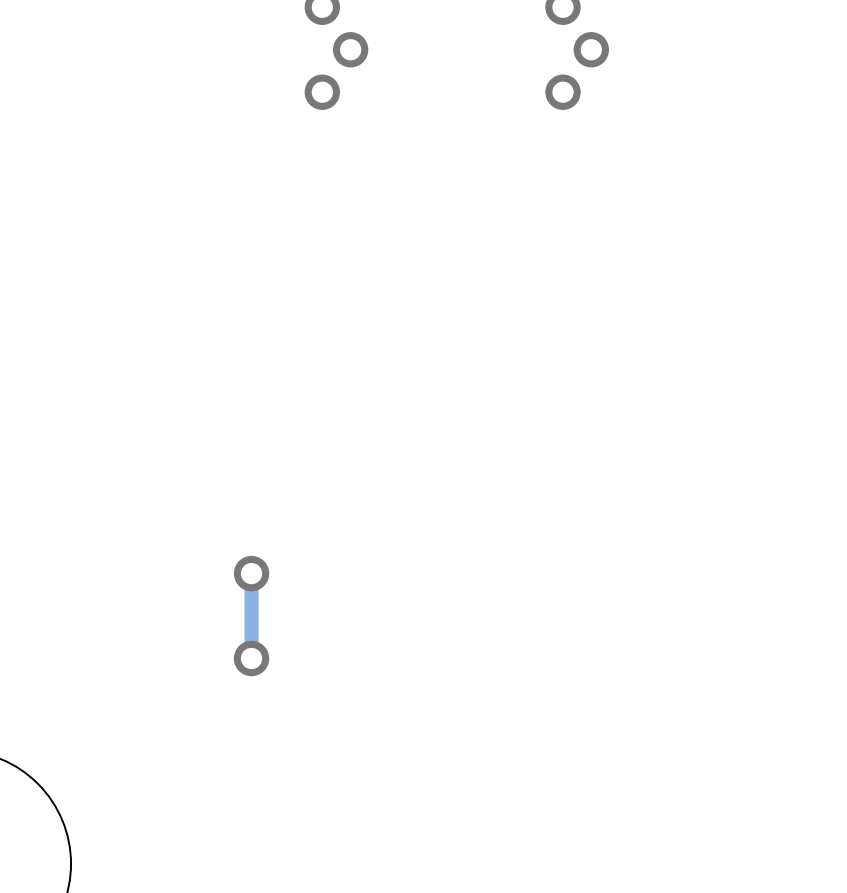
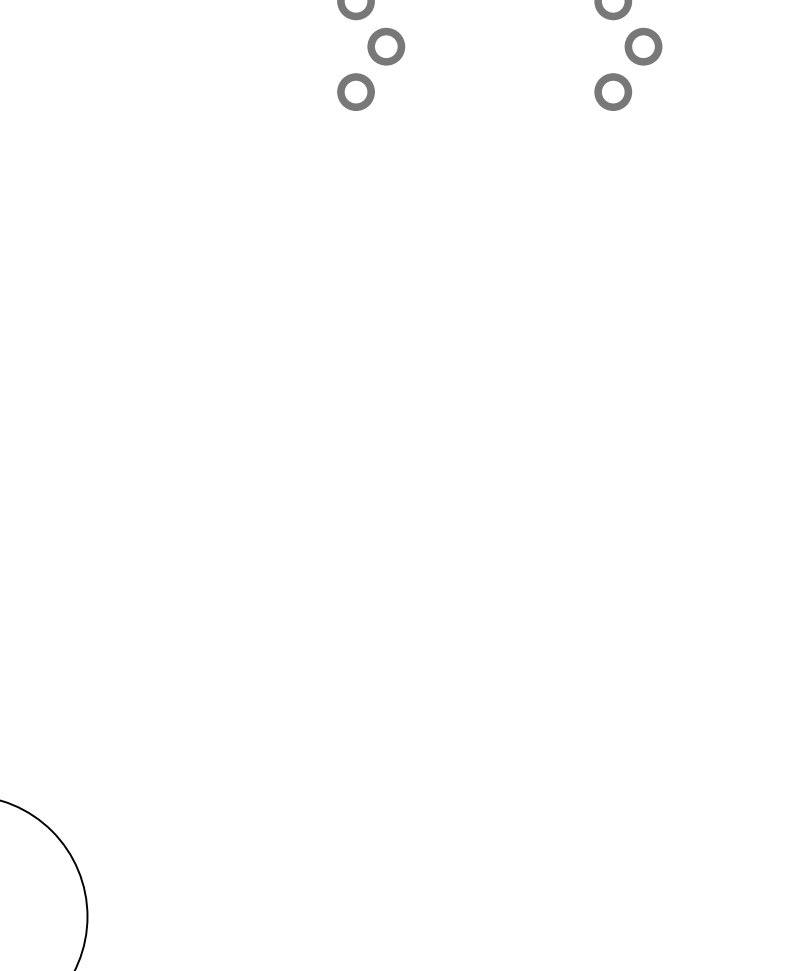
track: (251, 573) (251, 658) -> none
via: (251, 573) -> none
via: (251, 658) -> none

